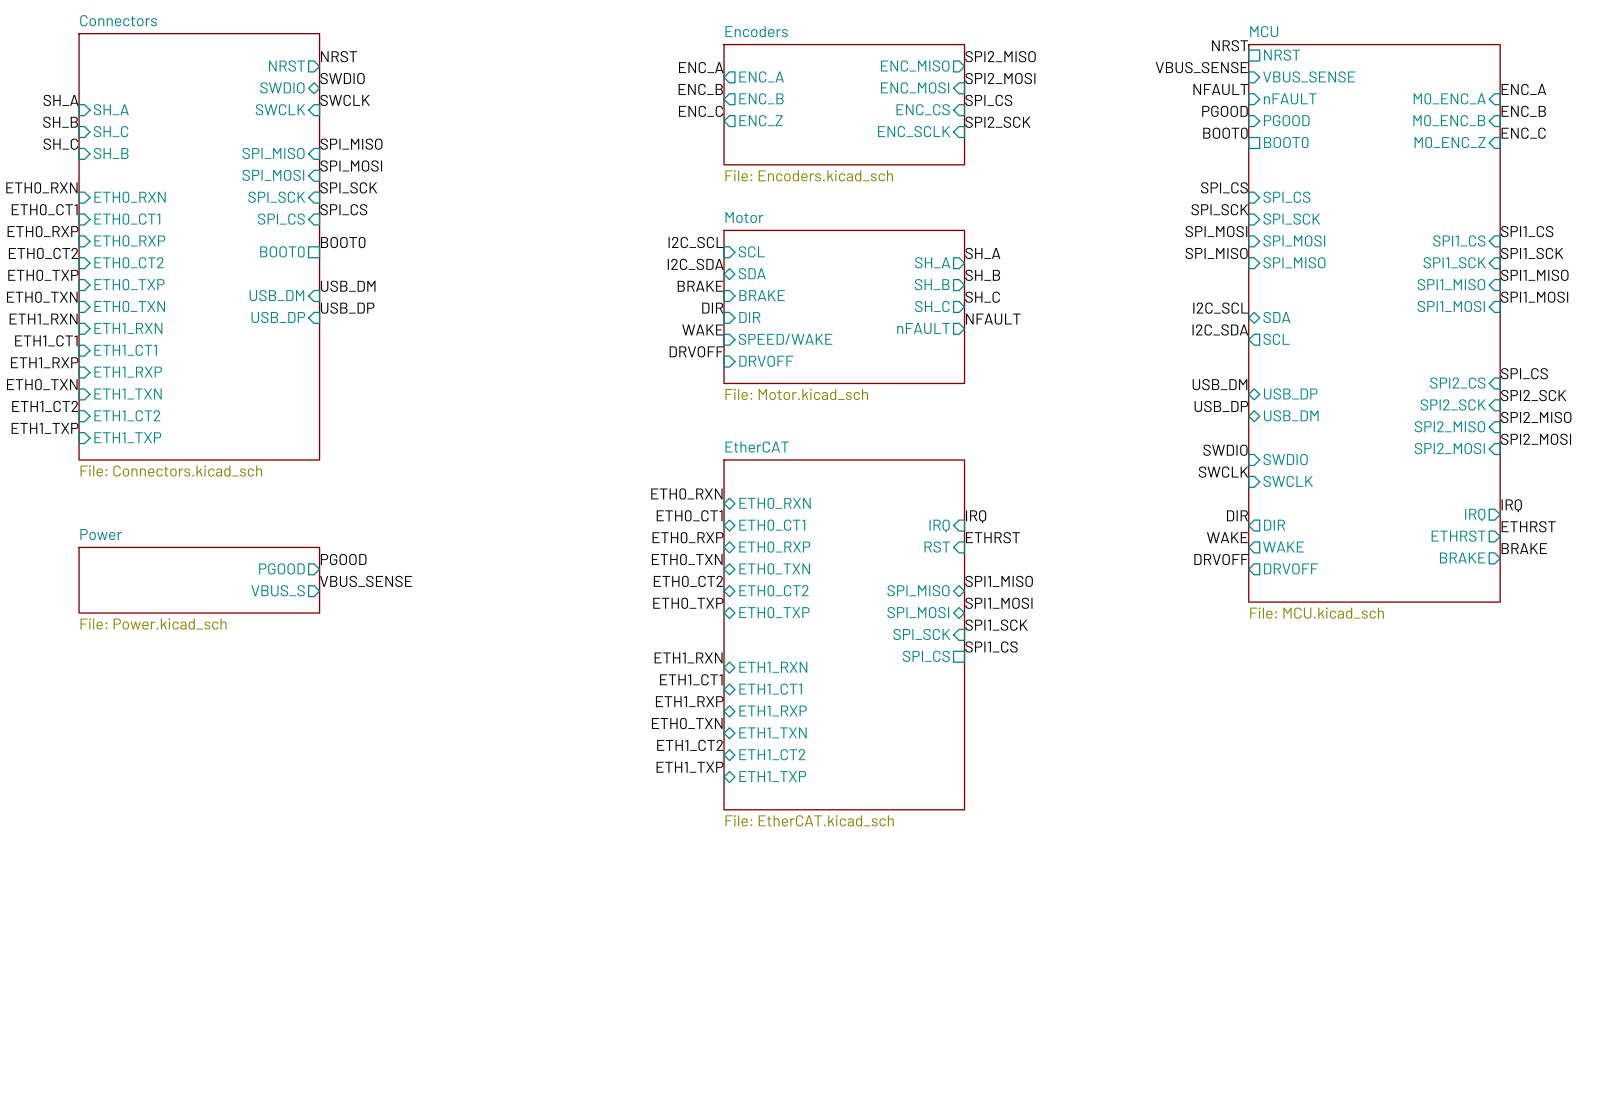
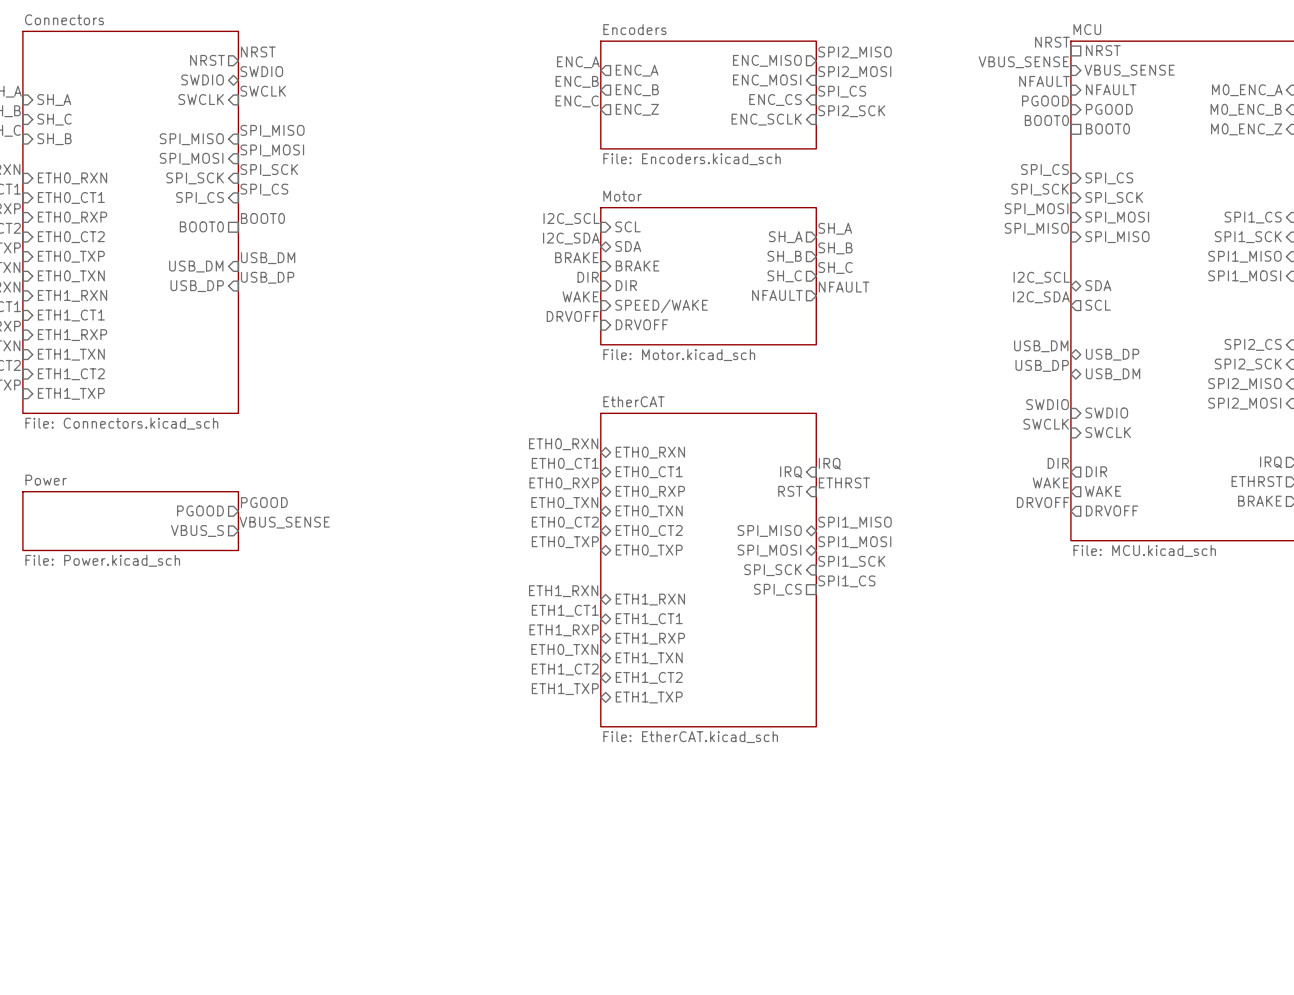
sheet pin: nFAULT (1290, 98) -> NFAULT (1111, 89)
sheet pin: nFAULT (923, 328) -> NFAULT (777, 295)

